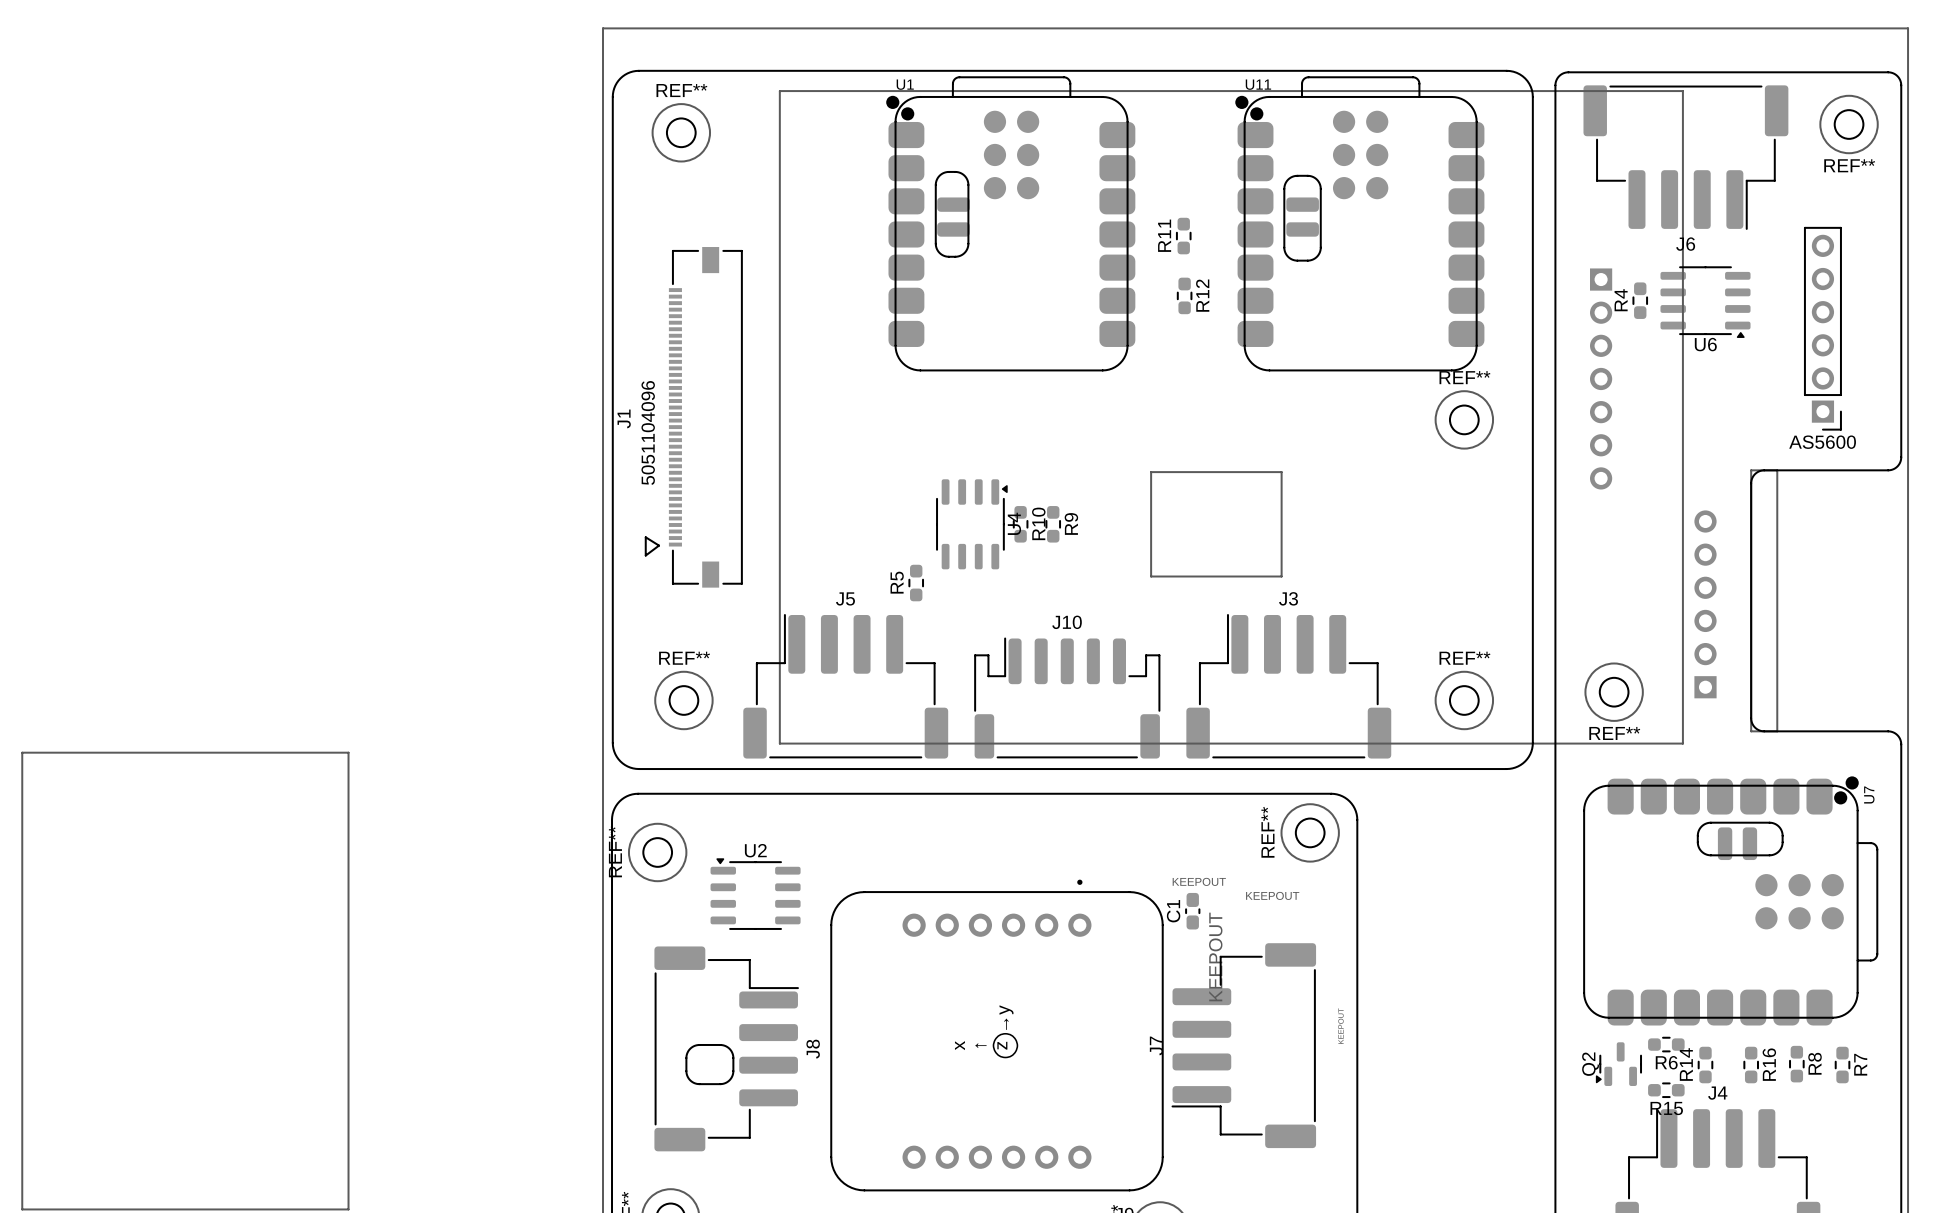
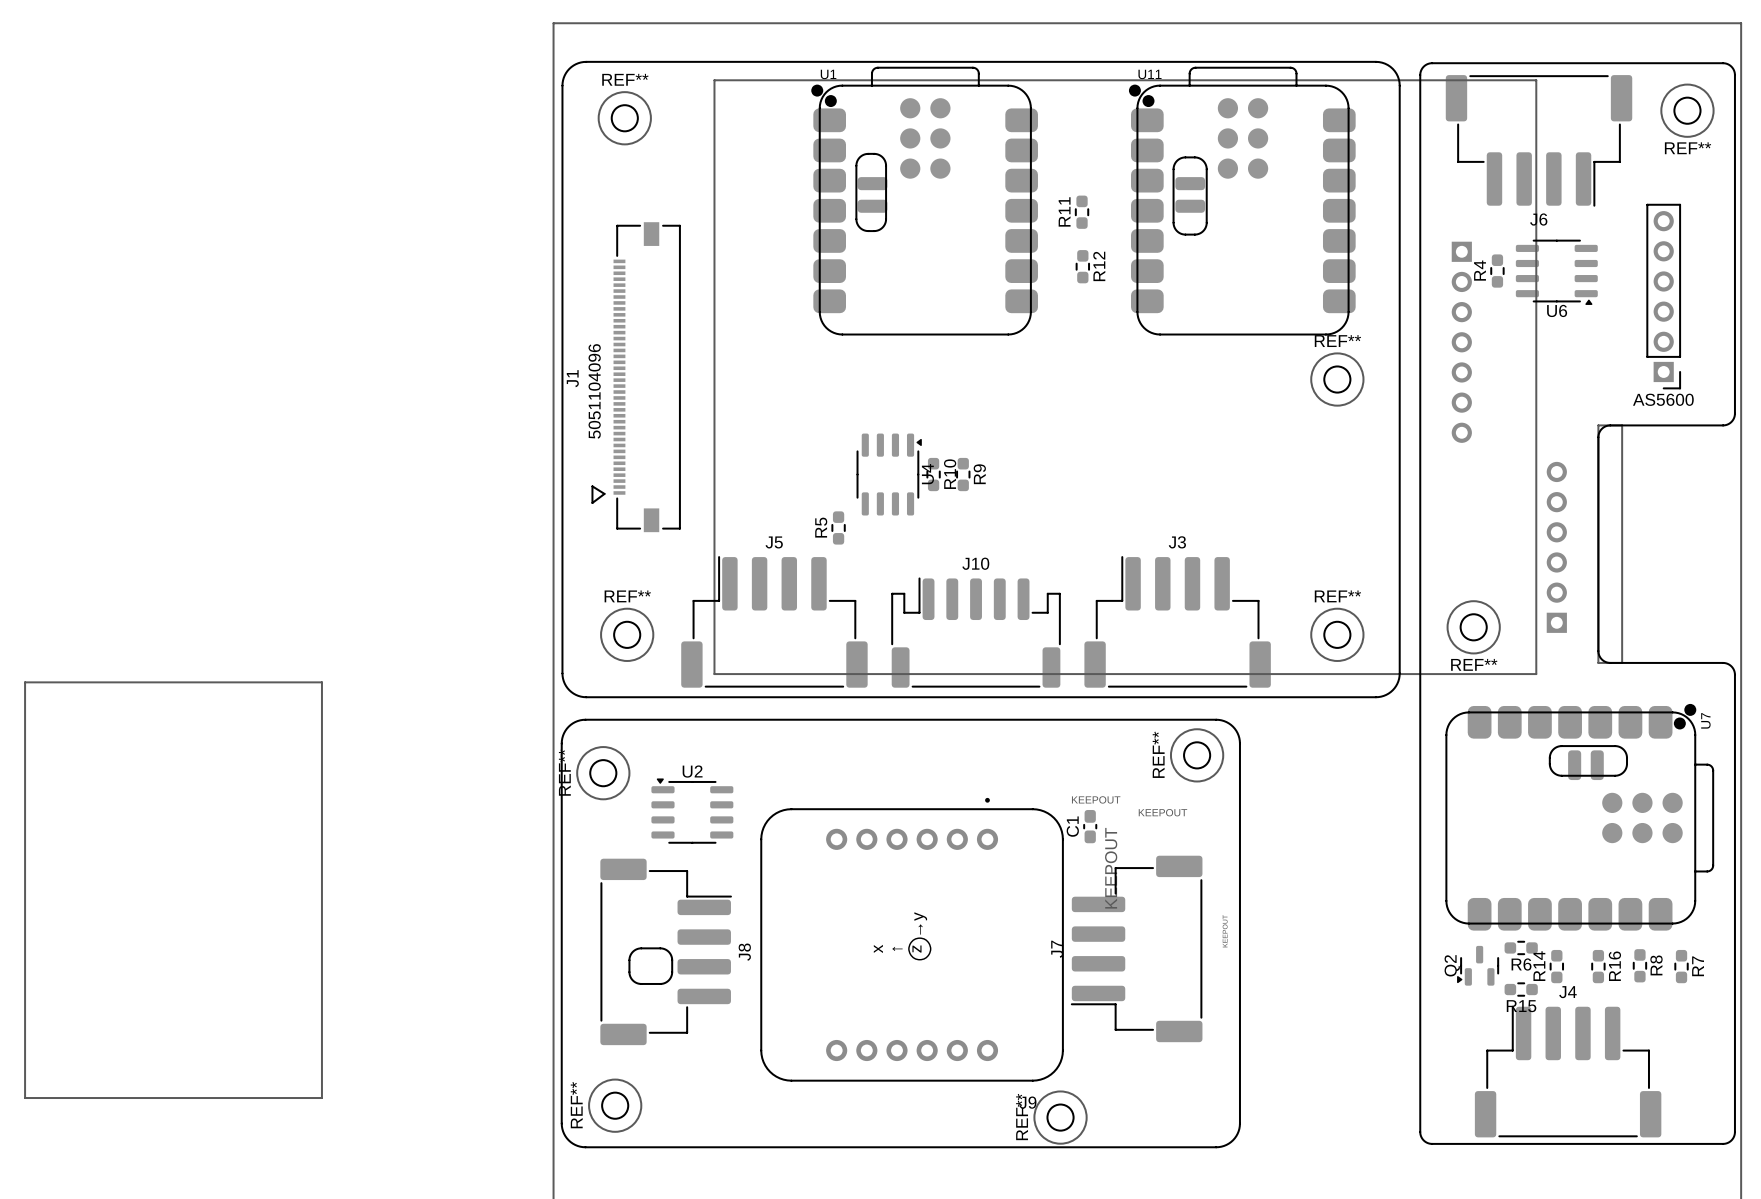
line: (1151, 472) (1281, 472) (1281, 576) (1151, 576) (1151, 472) -> none

